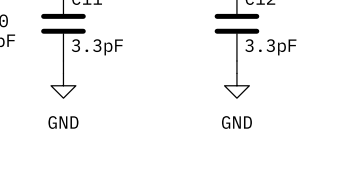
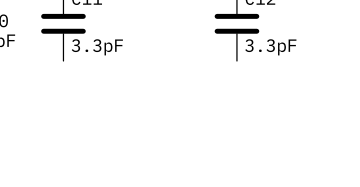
wire: (63, 61) (63, 73) -> none
wire: (236, 61) (236, 73) -> none
power symbol: GND (63, 85) -> none
power symbol: GND (236, 85) -> none

